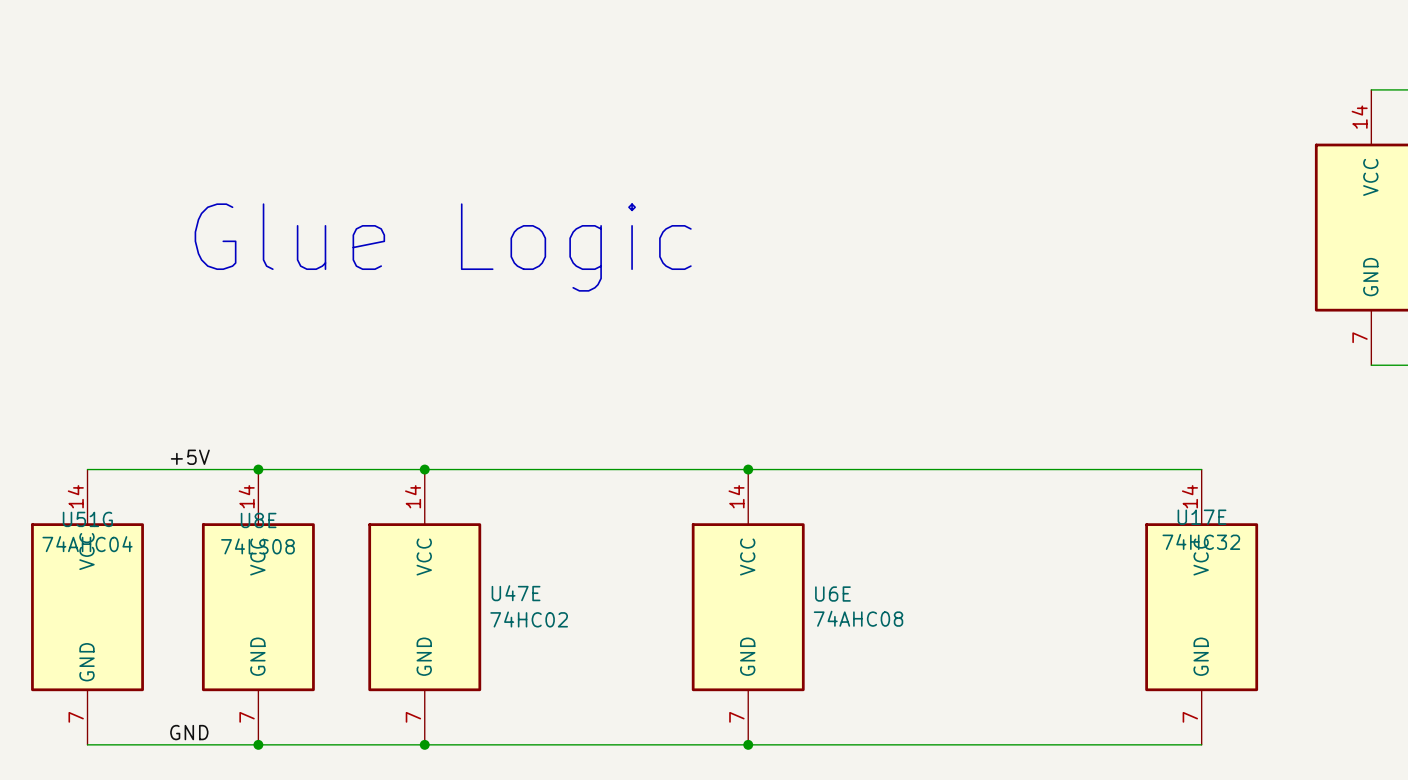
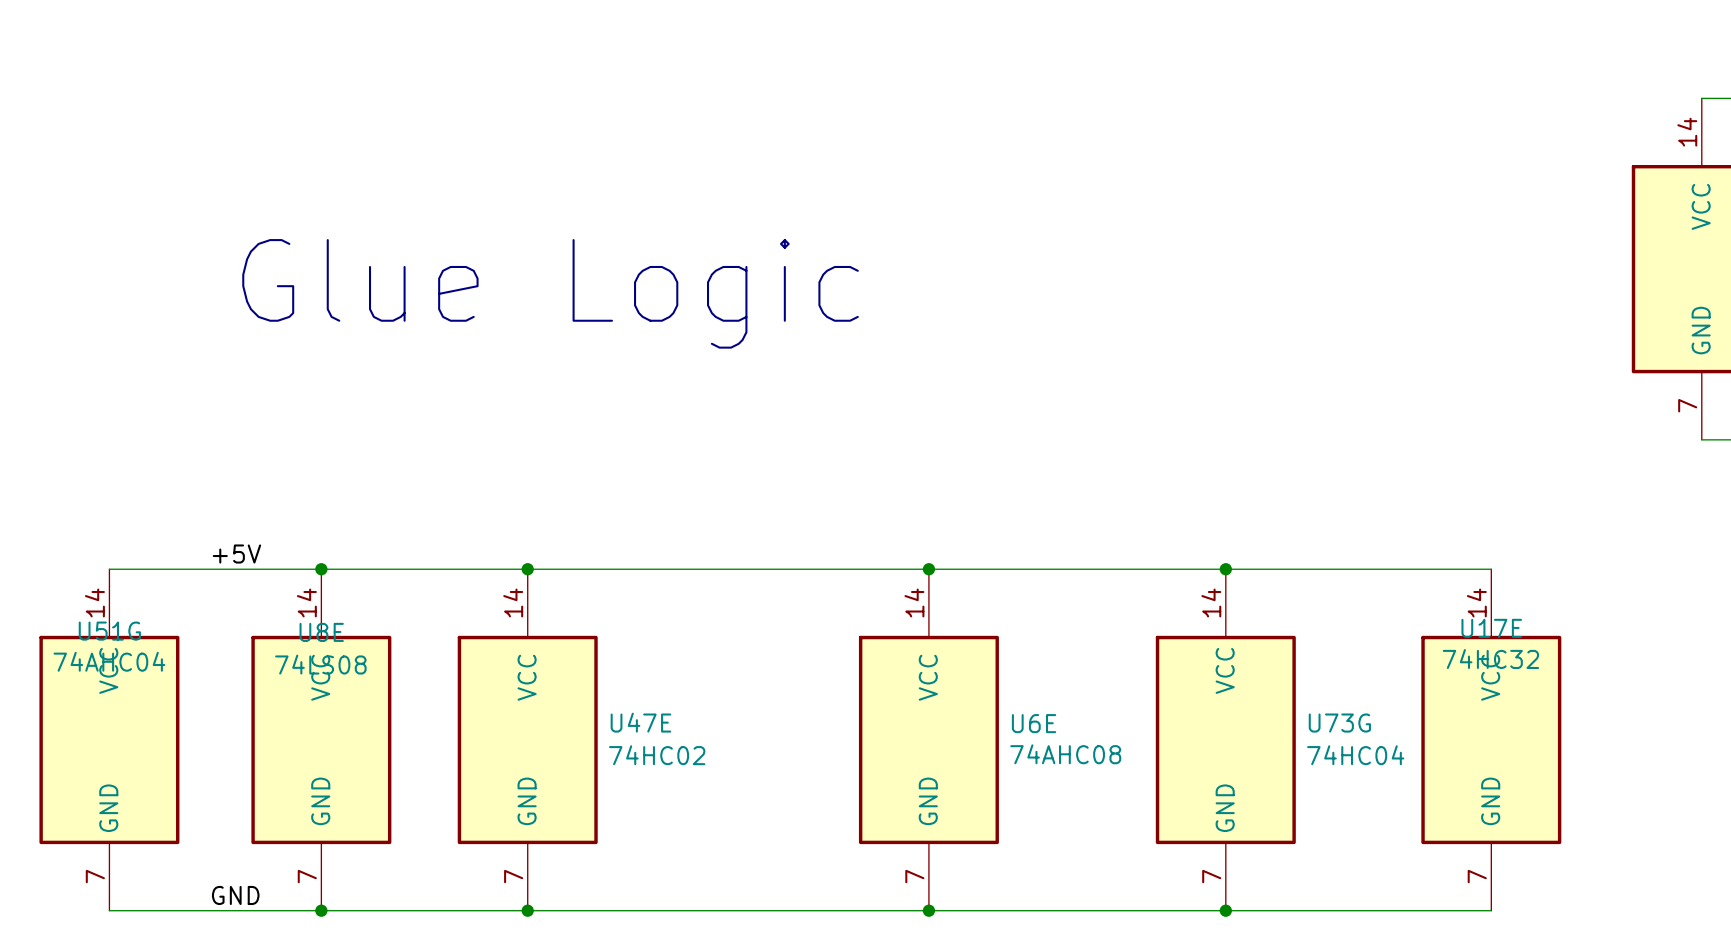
junction: none -> (1225, 569)
U73G: none -> 74HC04 (1225, 739)
junction: none -> (1225, 910)

